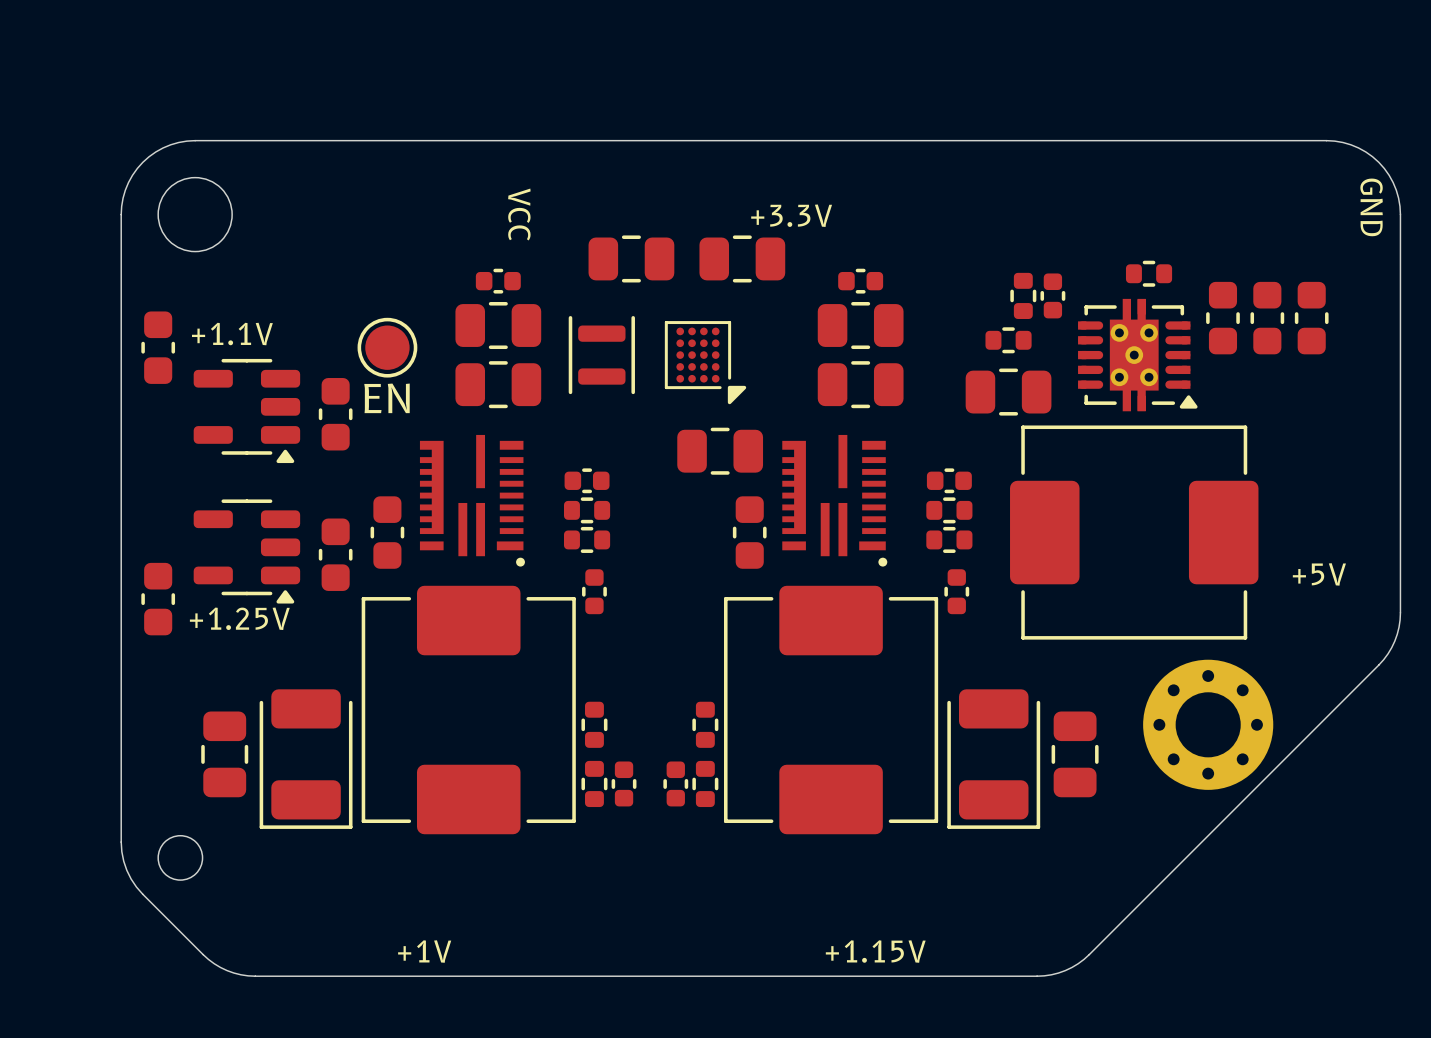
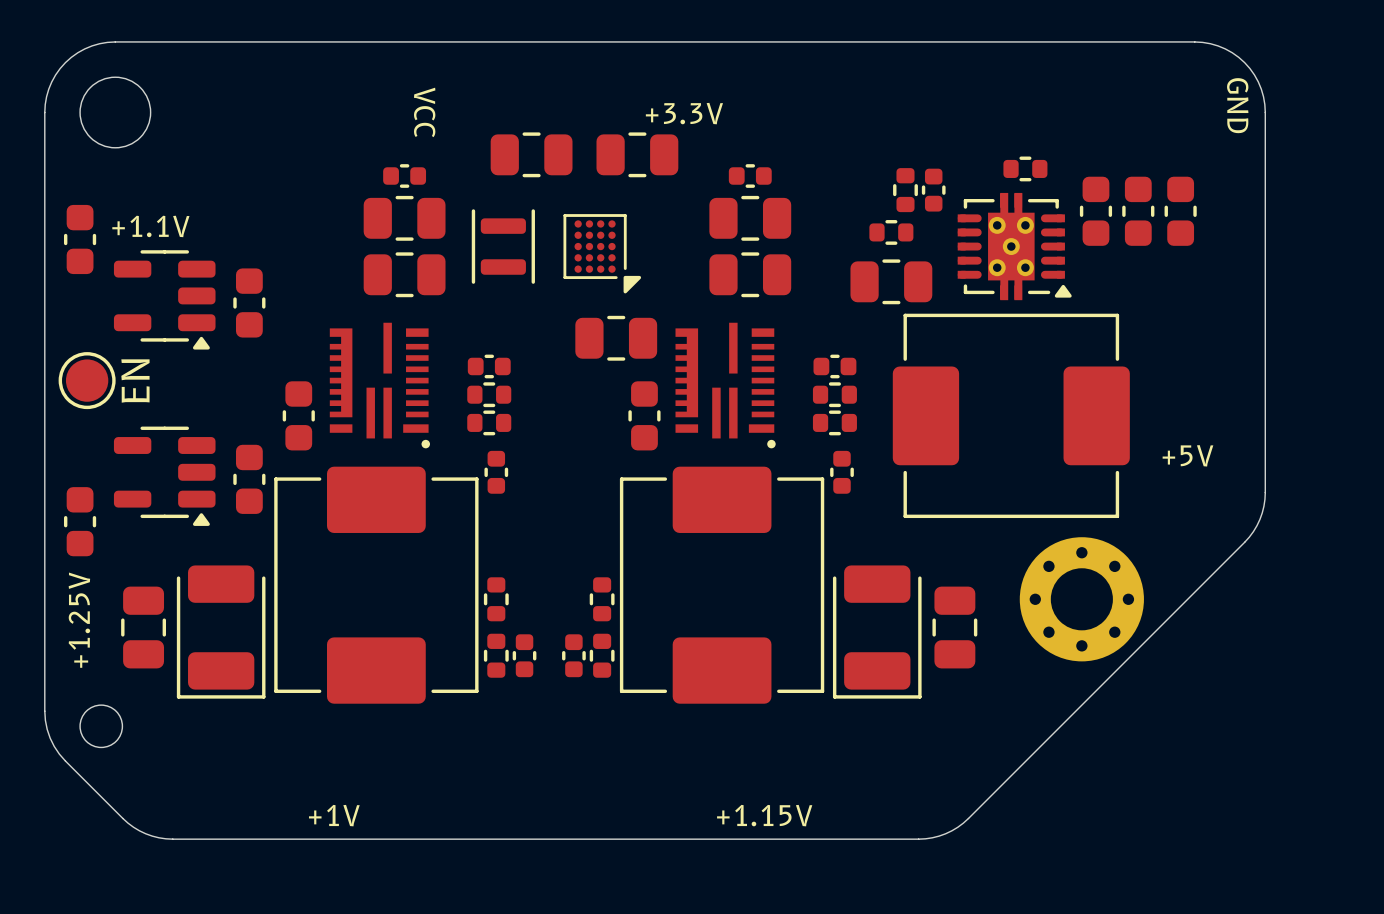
part position: (387, 347) -> (87, 380)
part value rotation: 0° (387, 398) -> 90° counterclockwise (135, 381)
part position: (246, 551) -> (164, 476)
part position: (335, 554) -> (249, 479)
part position: (158, 599) -> (80, 521)
text rotation: 0° (239, 618) -> 90° counterclockwise (79, 620)
text position: +1.25V (239, 618) -> +1.25V (79, 620)

